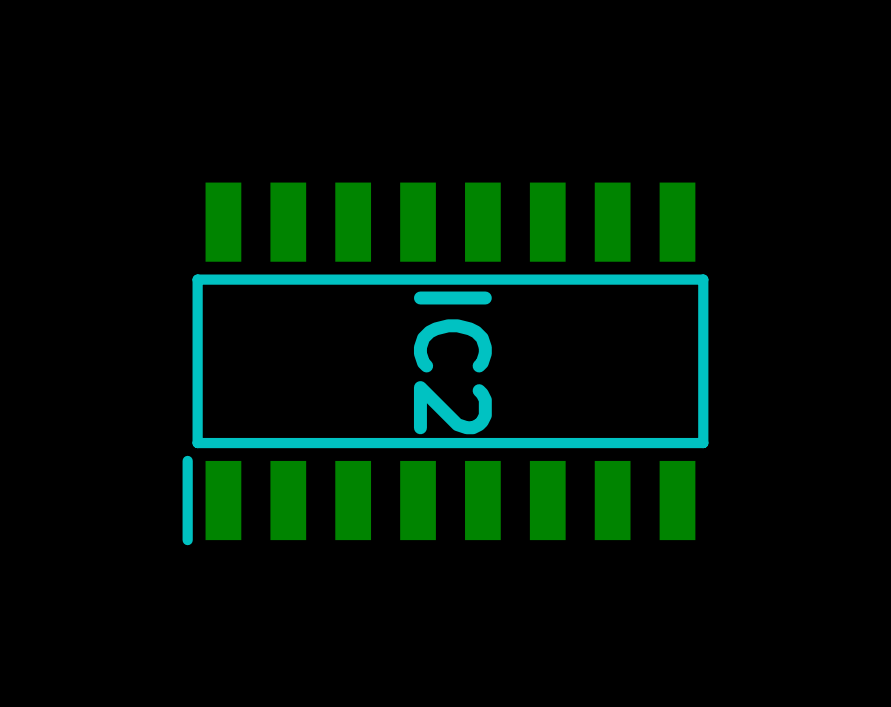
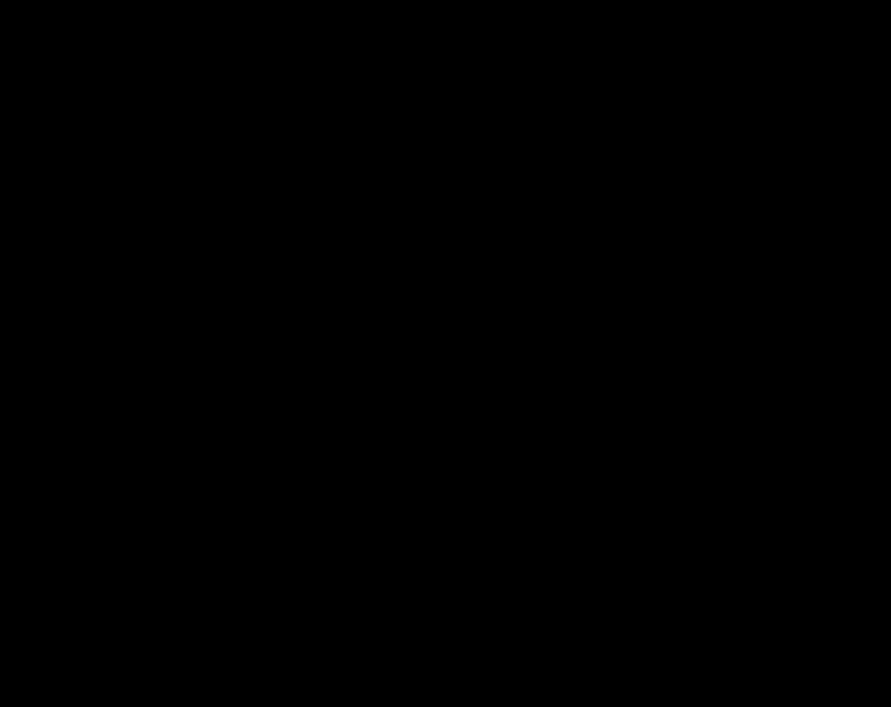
IC2: (445, 363) -> none

